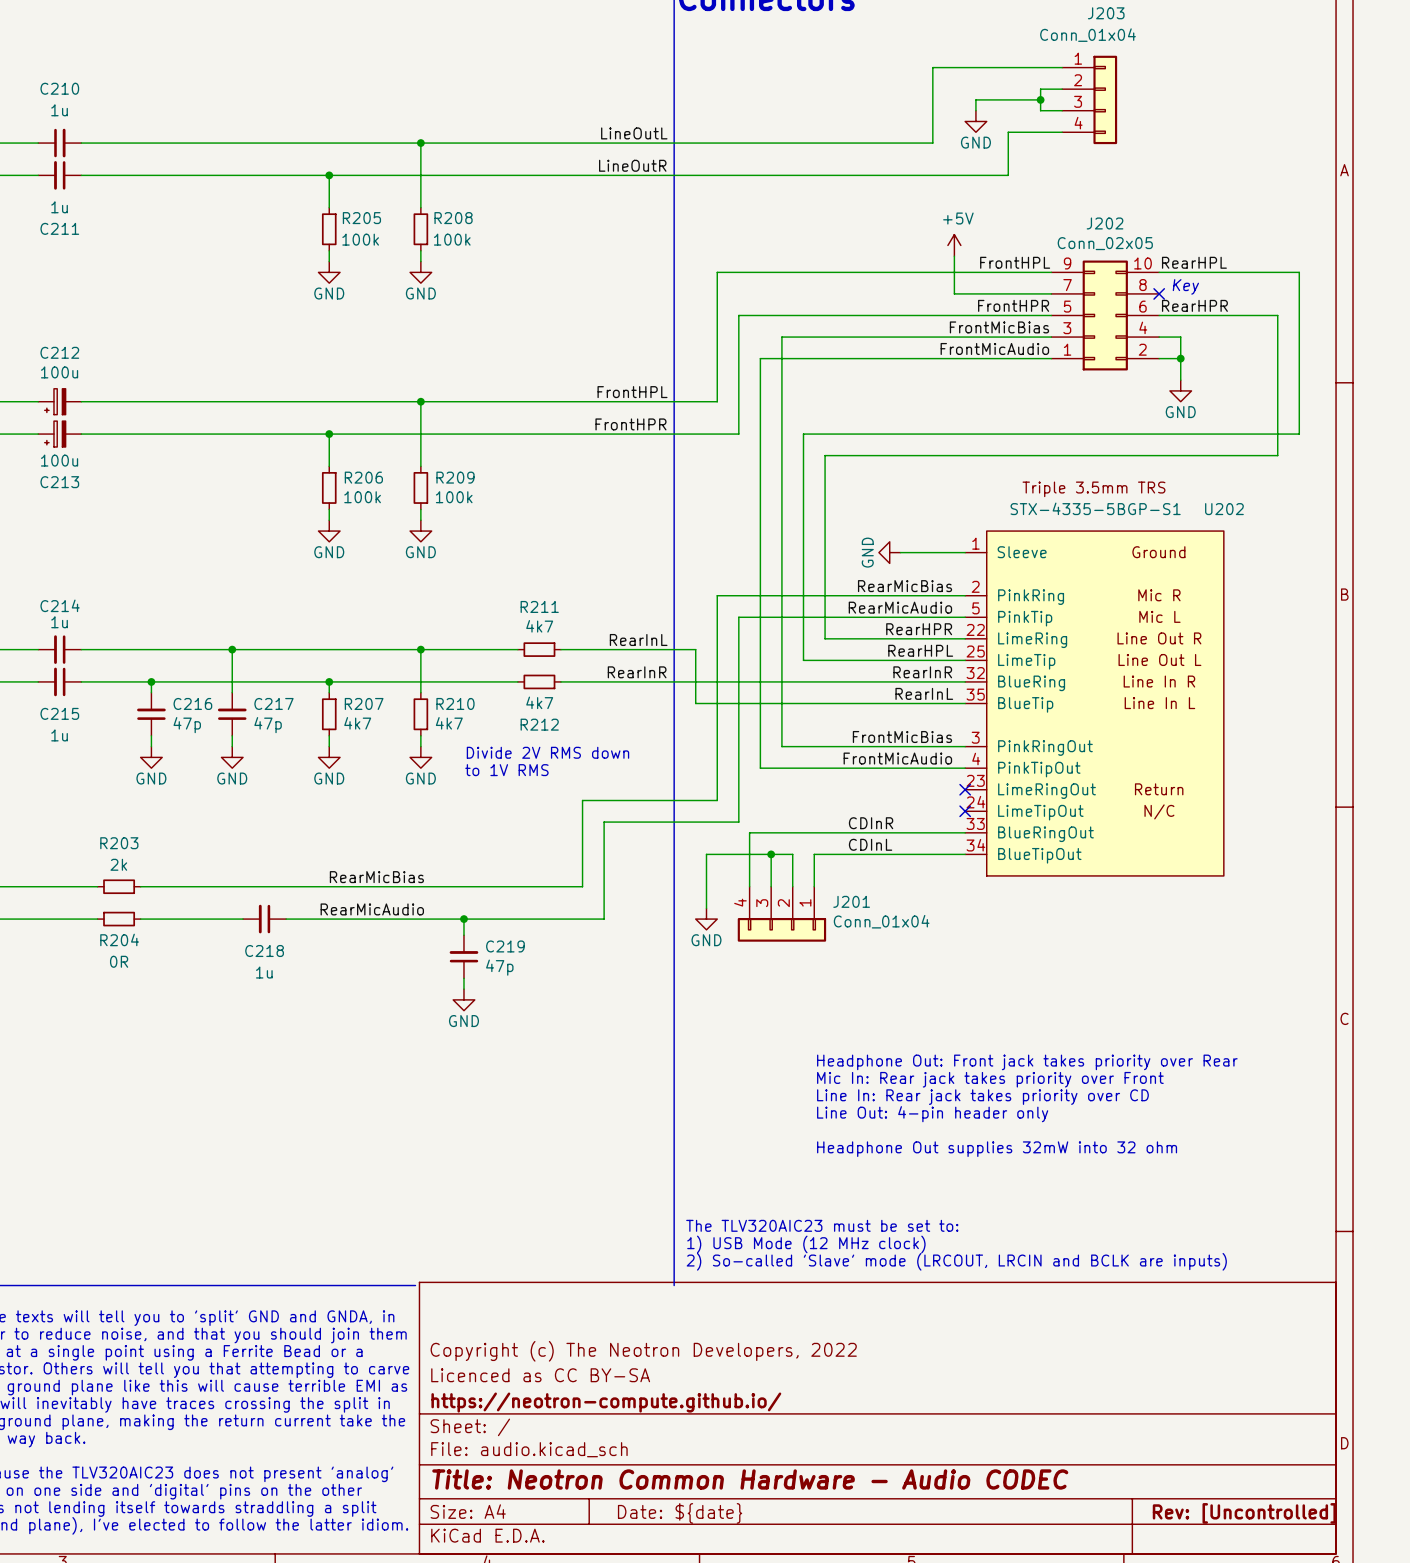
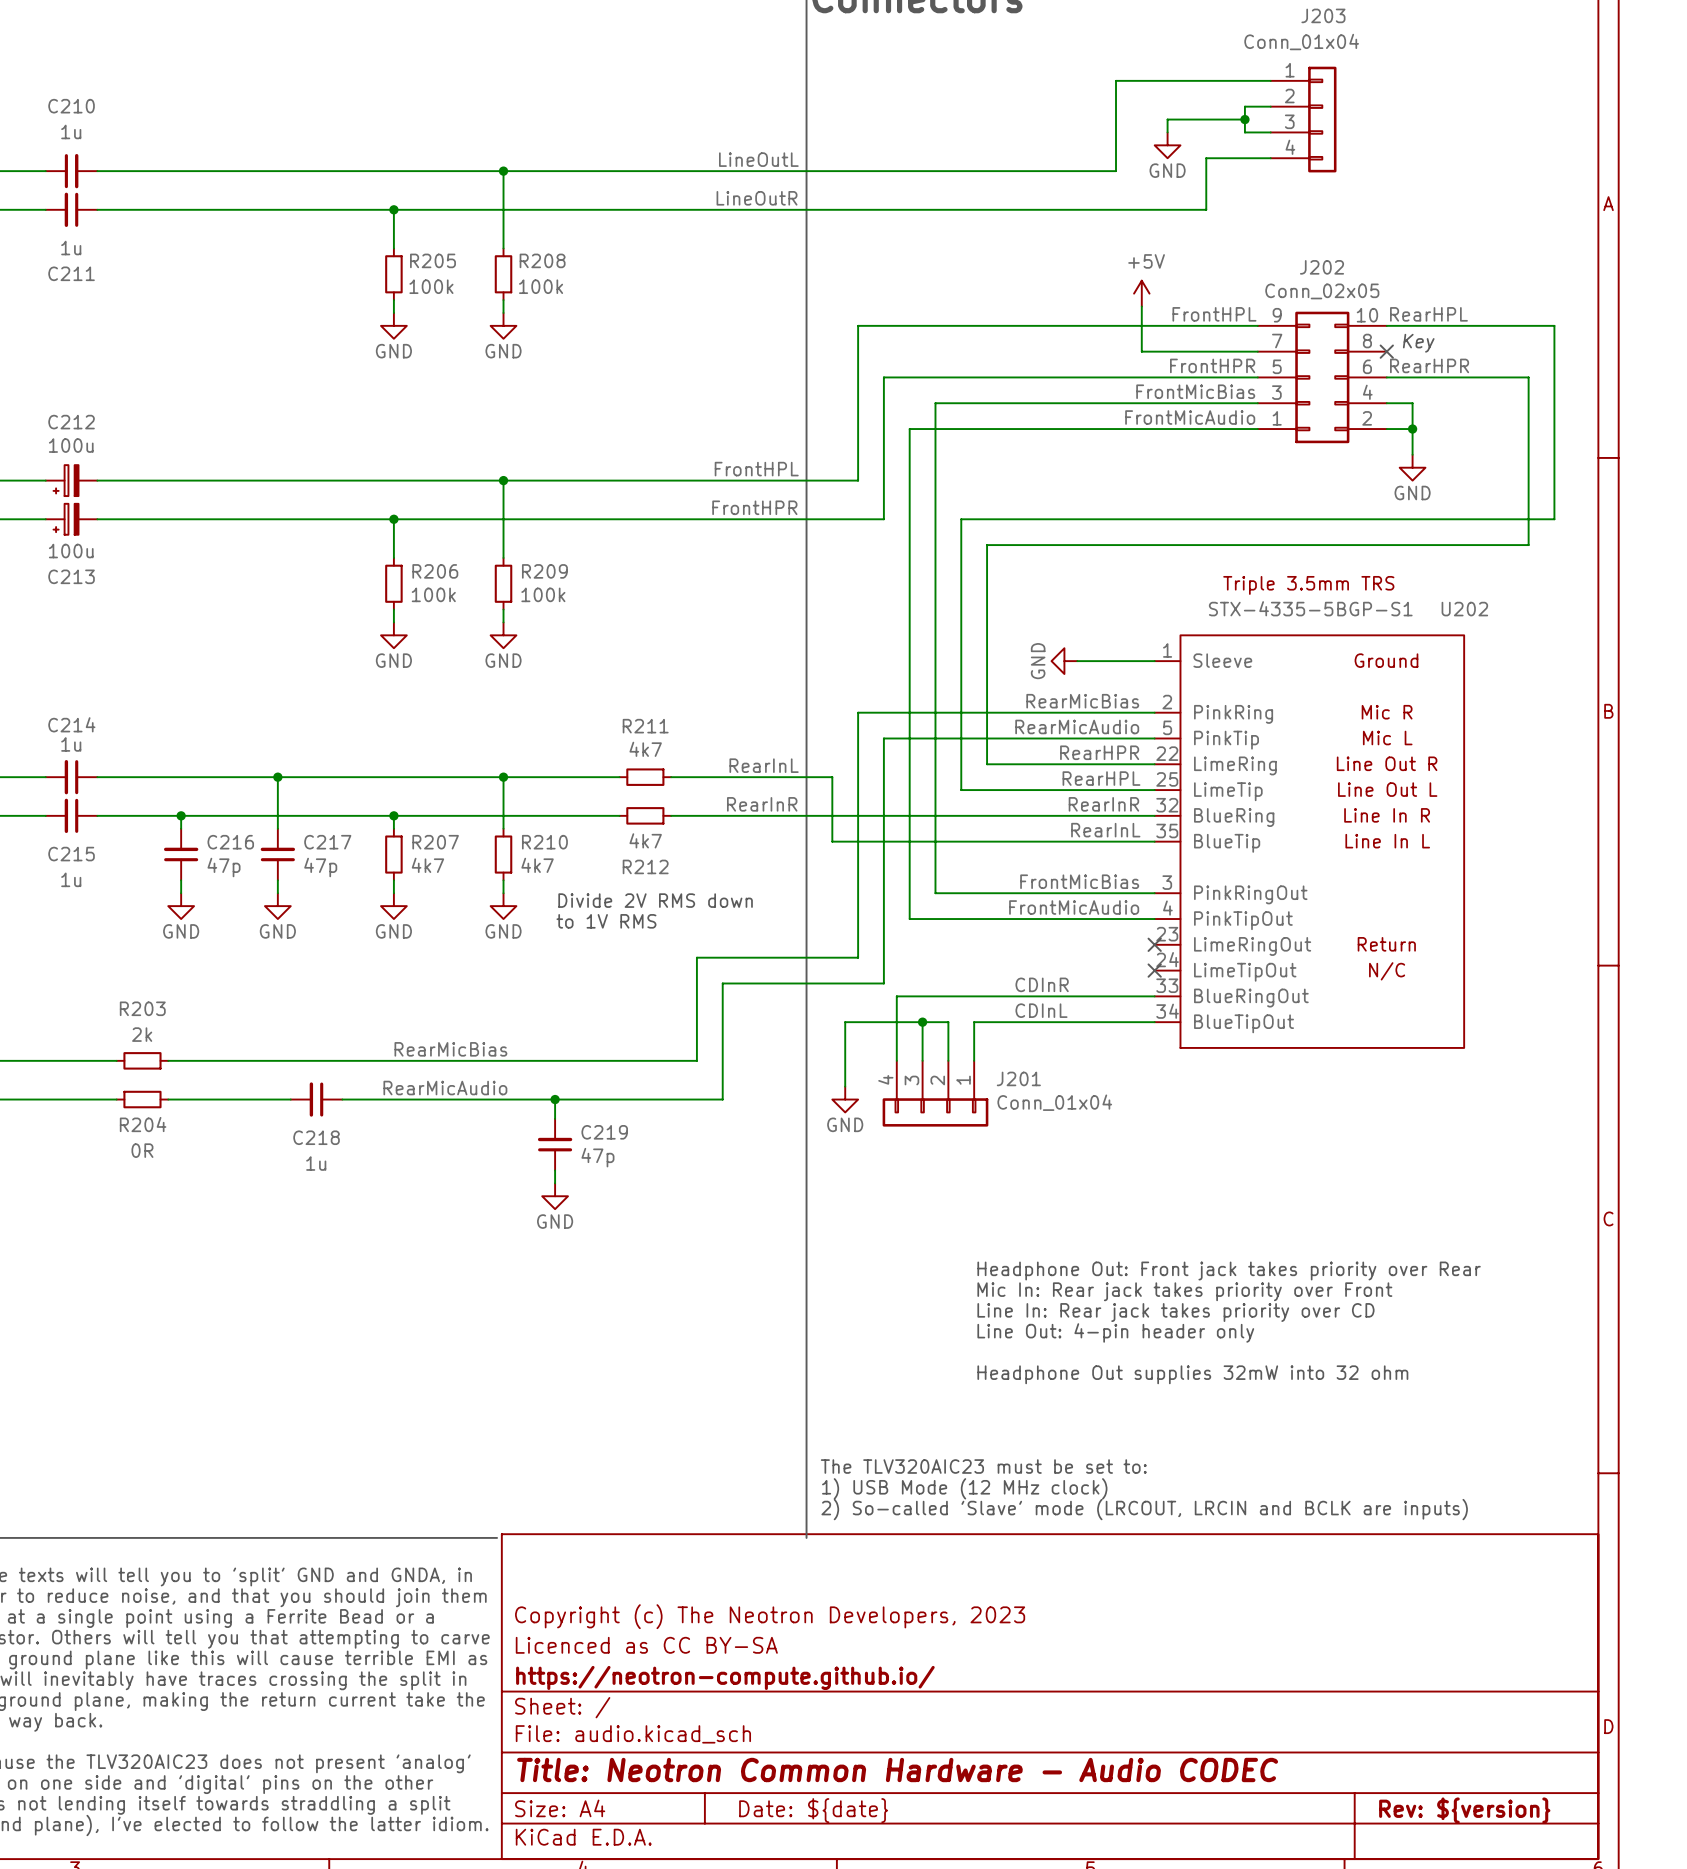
title block: Copyright (c) The Neotron Developers, 2022 (643, 1351) -> Copyright (c) The Neotron Developers, 2023 (770, 1616)
title block: Rev: [Uncontrolled] (1244, 1513) -> Rev: ${version} (1464, 1810)

